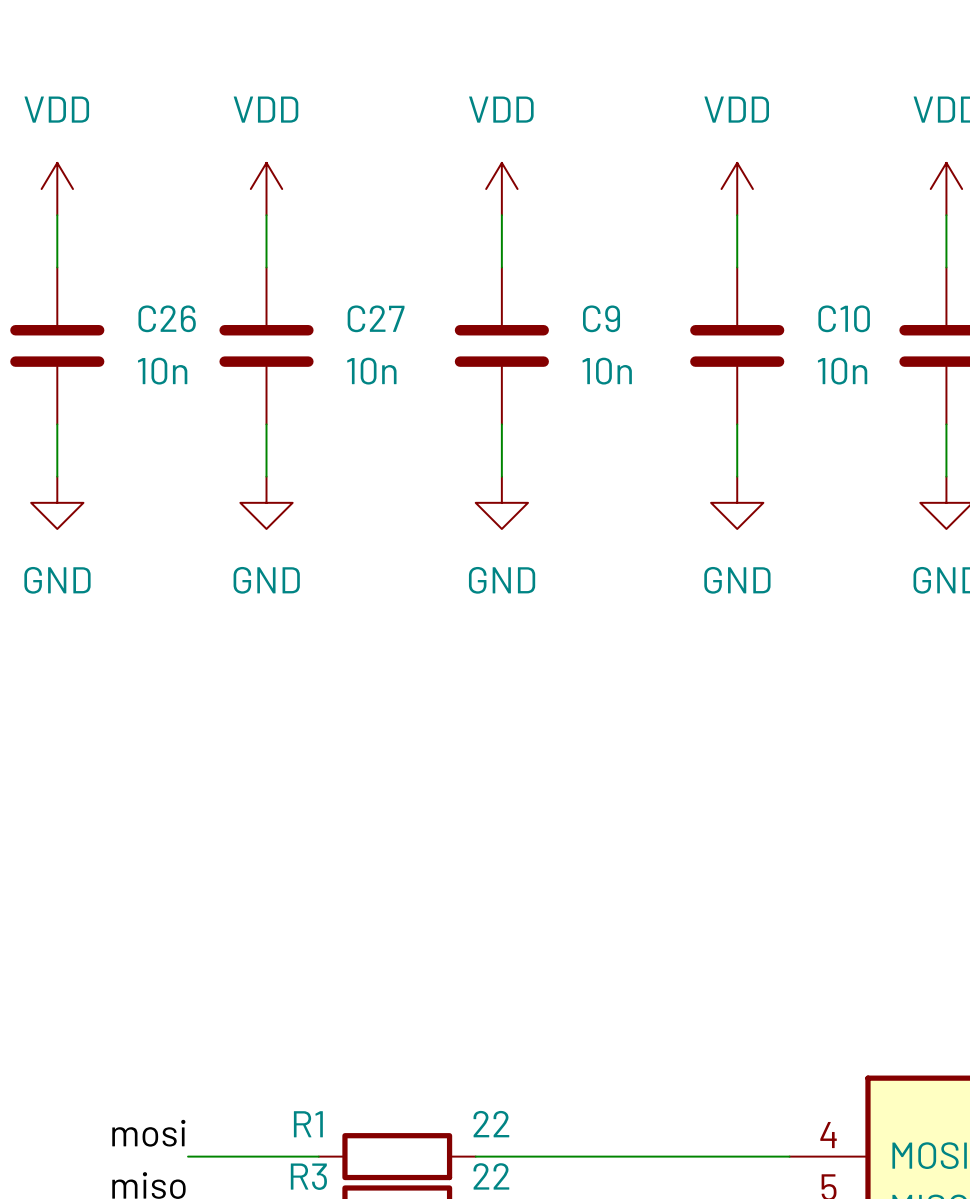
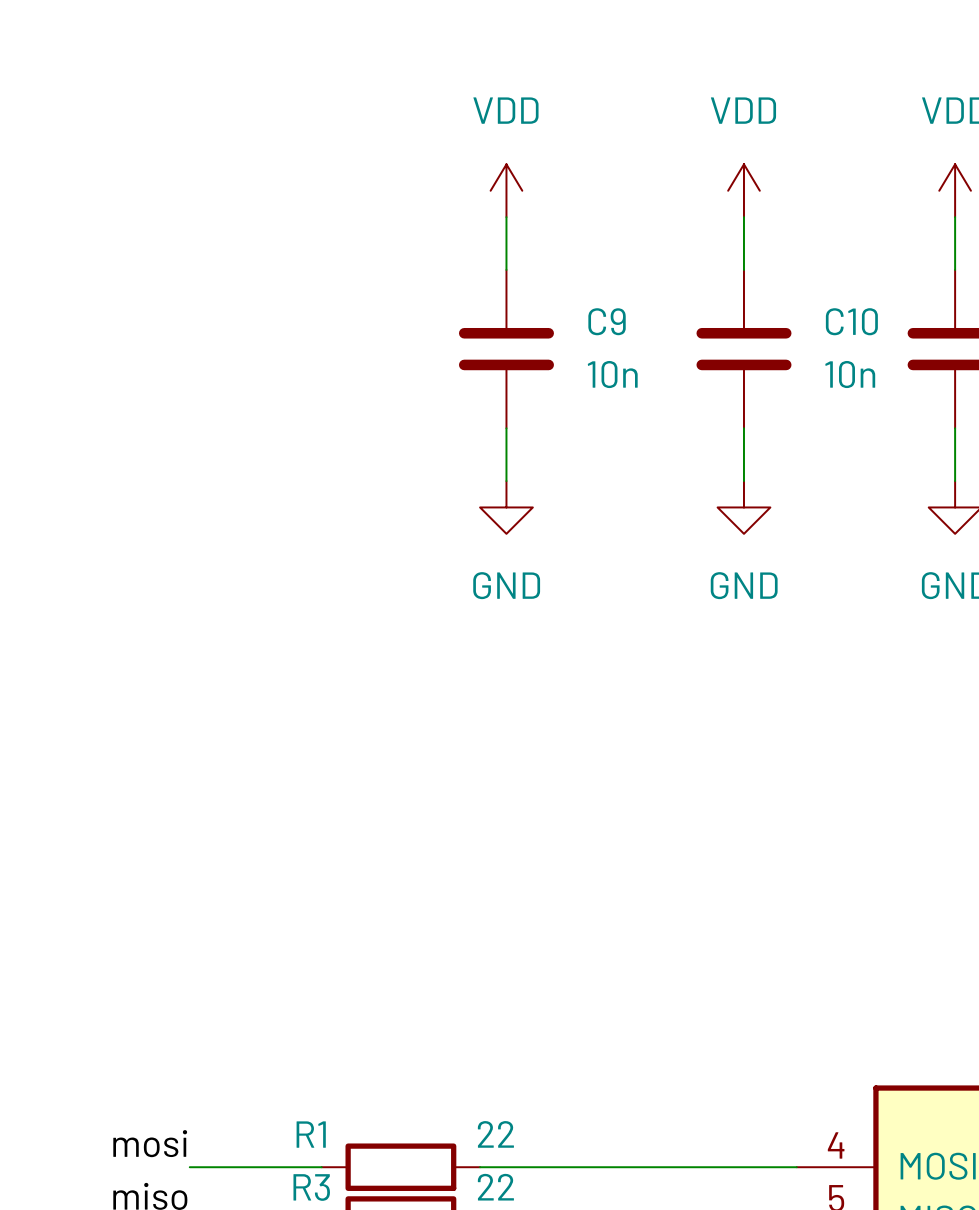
power symbol: VDD (57, 189) -> none
power symbol: VDD (266, 189) -> none
wire: (57, 215) (57, 267) -> none
wire: (266, 215) (266, 267) -> none
C26: 10n (57, 345) -> none
C27: 10n (266, 345) -> none
wire: (57, 424) (57, 476) -> none
wire: (266, 424) (266, 476) -> none
power symbol: GND (57, 502) -> none
power symbol: GND (266, 502) -> none

